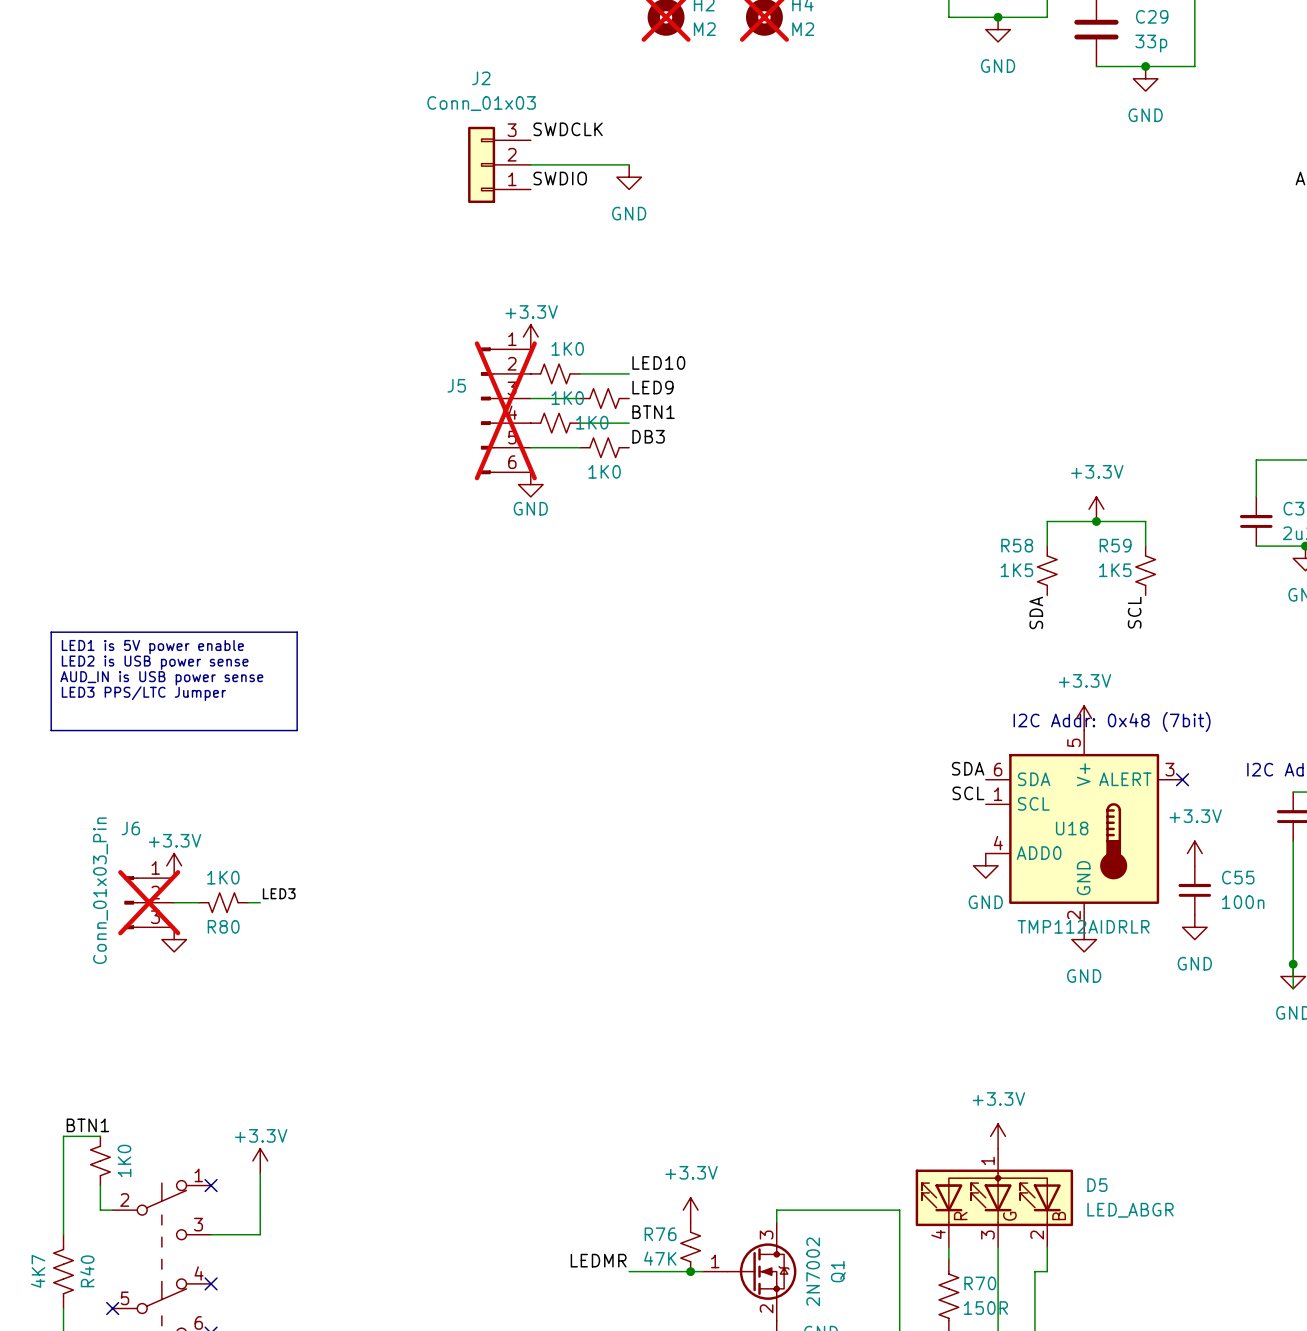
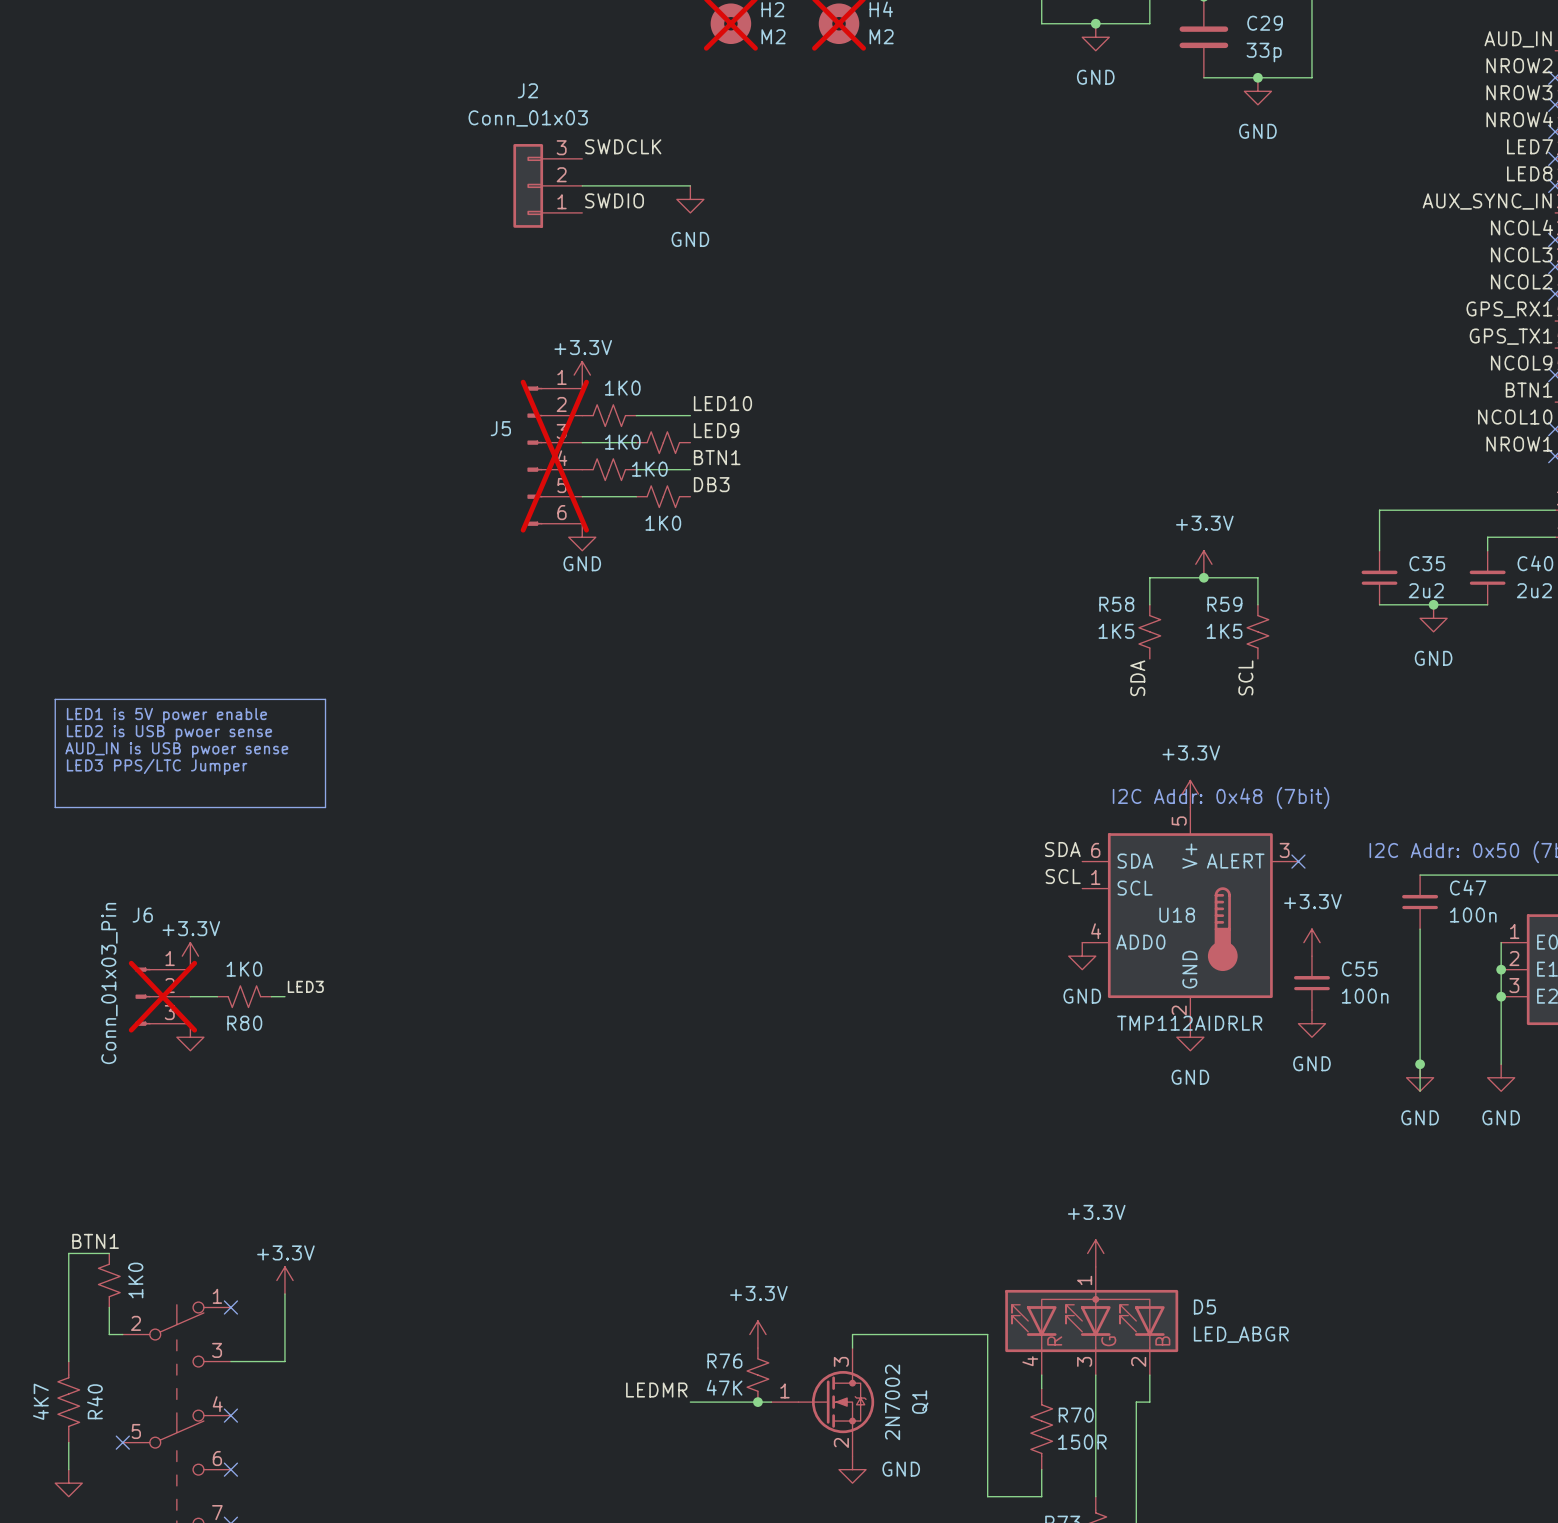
text: LED2 is USB power sense (155, 662) -> LED2 is USB pwoer sense (169, 732)
text: AUD_IN is USB power sense (161, 678) -> AUD_IN is USB pwoer sense (176, 750)

